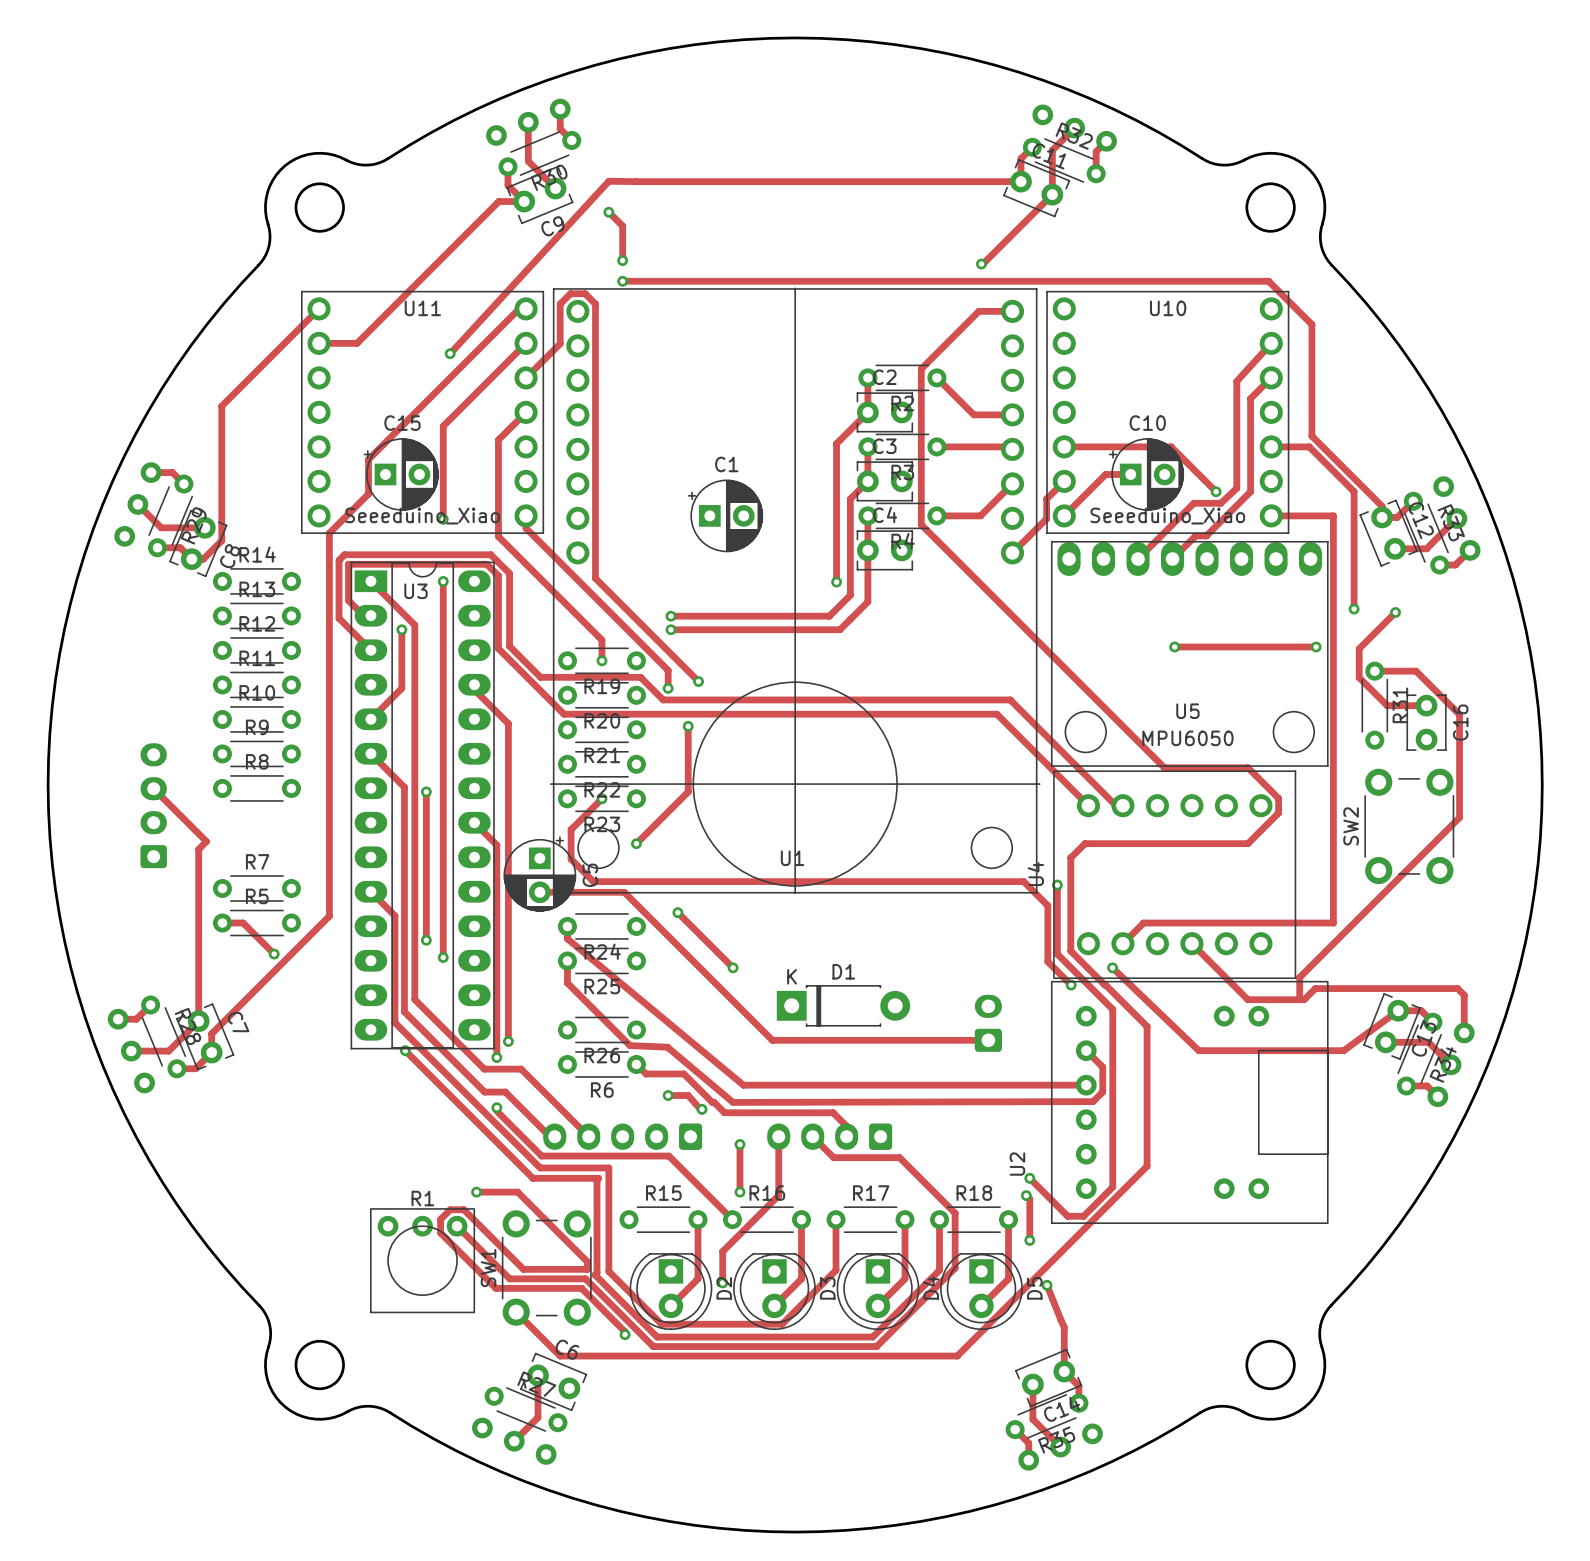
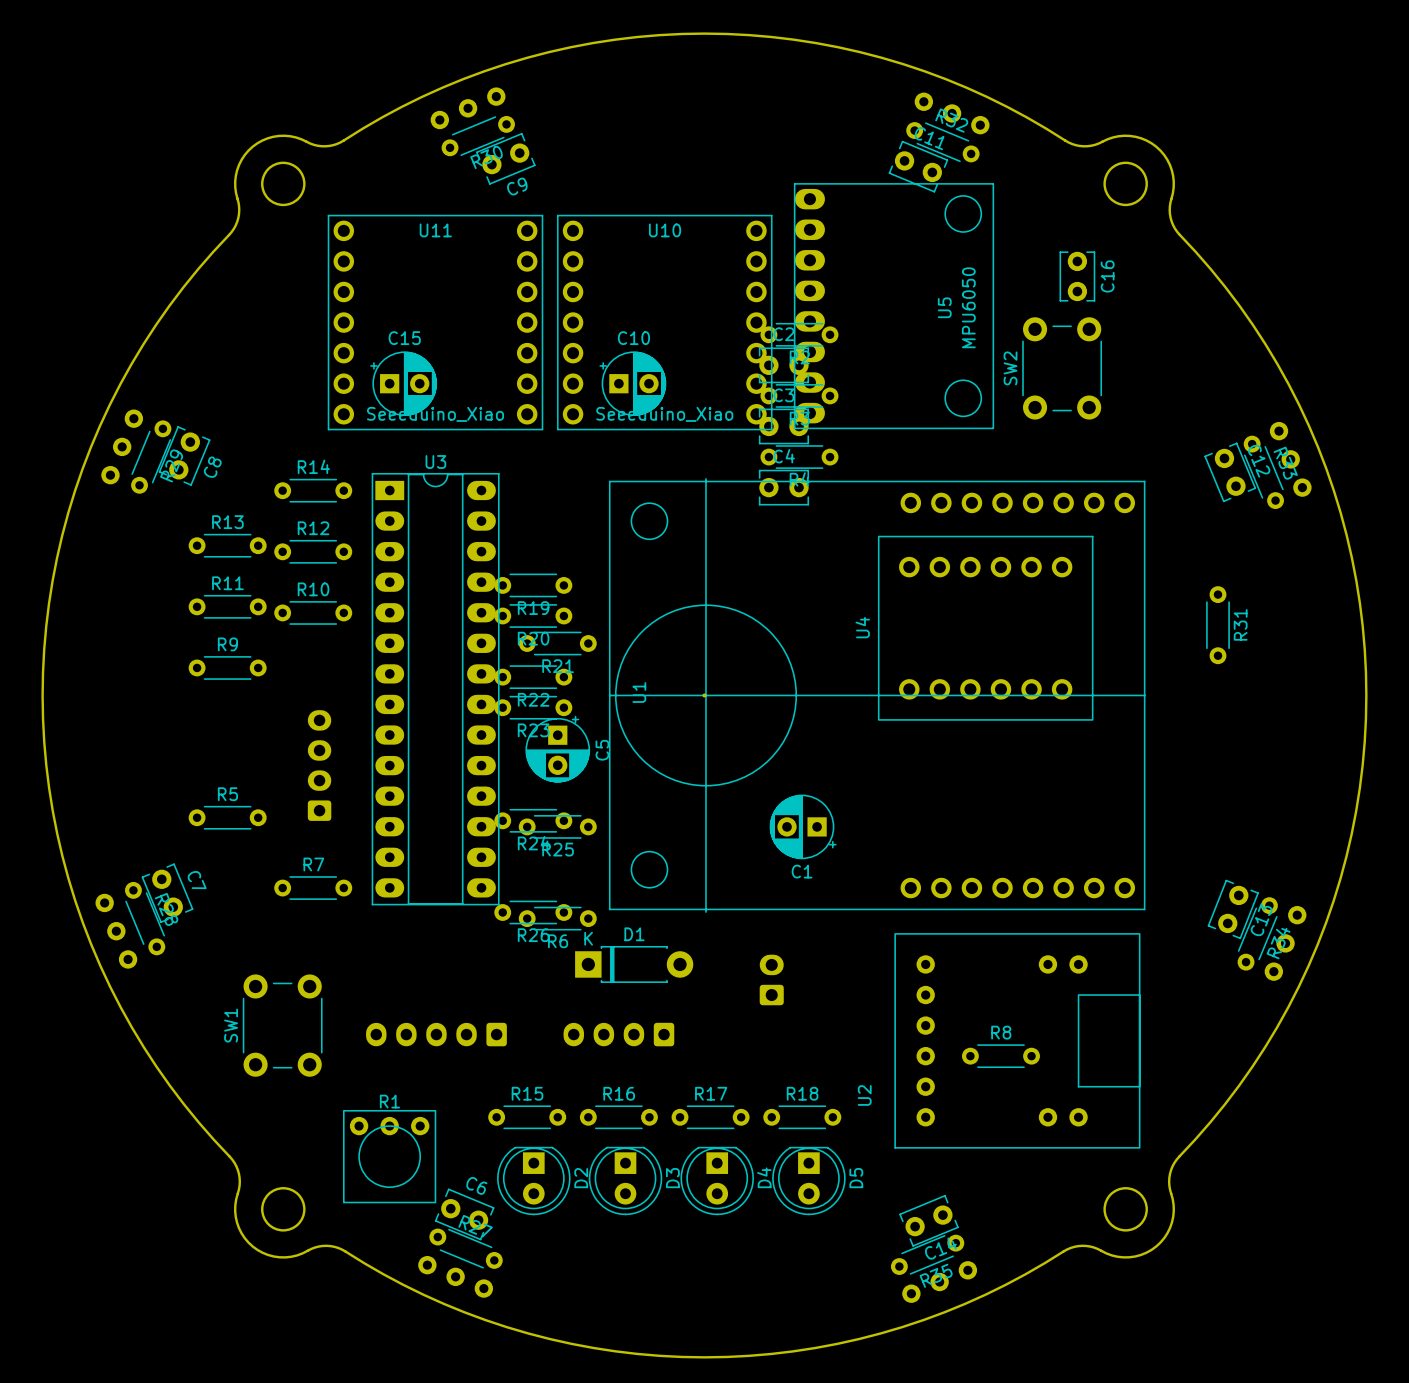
track: (560, 109) (560, 128) (571, 140) -> none
track: (528, 122) (528, 161) (555, 188) -> none
track: (1074, 128) (1052, 150) (1052, 194) (981, 264) -> none
track: (1106, 141) (1096, 151) (1096, 173) -> none
track: (1032, 147) (1021, 158) (1021, 181) (608, 181) (450, 353) -> none
track: (507, 166) (507, 185) (524, 201) (498, 201) (357, 343) (319, 343) -> none
C9 position: (539, 195) -> (505, 158)
track: (608, 212) (622, 226) (622, 260) -> none
via: (608, 212) -> none
via: (622, 260) -> none
via: (981, 264) -> none
track: (622, 281) (1268, 281) (1311, 324) (1311, 436) (1382, 506) (1382, 517) (1397, 517) (1413, 501) -> none
via: (622, 281) -> none
track: (319, 308) (221, 406) (221, 540) (203, 559) (191, 559) (180, 547) (157, 547) -> none
track: (526, 308) (519, 308) (368, 459) (368, 494) (329, 533) (329, 916) (211, 1033) (211, 1052) (195, 1068) (177, 1068) -> none
track: (1012, 311) (978, 311) (921, 368) (921, 524) (1164, 767) (1247, 767) (1278, 798) (1278, 813) (1247, 843) (1084, 843) (1070, 857) (1070, 951) (1147, 1026) (1147, 1166) (957, 1356) (560, 1356) (516, 1312) -> none
track: (526, 343) (443, 426) (443, 519) -> none
track: (1271, 343) (1236, 381) (1236, 488) (1220, 503) (1193, 503) (1138, 559) -> none
via: (450, 353) -> none
track: (526, 377) (560, 343) (560, 304) (570, 293) (585, 293) (595, 304) (595, 578) (698, 681) -> none
track: (867, 377) (867, 412) (836, 443) (836, 582) -> none
track: (936, 377) (973, 414) (1012, 414) -> none
track: (1271, 377) (1250, 398) (1250, 491) (1206, 535) (1195, 535) (1172, 559) -> none
U11 position: (422, 412) -> (435, 322)
track: (526, 412) (498, 439) (498, 536) (601, 640) (601, 660) -> none
U10 position: (1167, 412) -> (664, 322)
track: (867, 446) (867, 481) (850, 498) (850, 595) (829, 616) (670, 616) -> none
track: (936, 446) (1010, 446) (1012, 449) -> none
track: (1064, 446) (1171, 446) (1216, 491) -> none
track: (1271, 446) (1309, 446) (1354, 491) (1354, 609) -> none
track: (151, 472) (172, 472) (183, 484) -> none
C15 position: (401, 474) -> (403, 383)
track: (1130, 474) (1105, 474) (1064, 515) -> none
C10 position: (1146, 474) -> (632, 383)
track: (1064, 481) (1046, 499) (1046, 518) (1012, 552) -> none
track: (1012, 483) (980, 515) (936, 515) -> none
via: (1216, 491) -> none
track: (137, 504) (161, 527) (204, 527) -> none
track: (526, 515) (526, 528) (668, 670) (668, 688) -> none
C1 rotation: 0° (725, 515) -> 180° (803, 826)
C1 position: (725, 515) -> (803, 826)
track: (867, 515) (867, 601) (840, 629) (670, 629) -> none
track: (1271, 515) (1333, 515) (1333, 923) (1143, 923) (1122, 943) -> none
track: (1456, 518) (1426, 548) (1395, 548) -> none
via: (443, 519) -> none
C8 position: (198, 543) -> (184, 455)
track: (1470, 550) (1455, 565) (1439, 565) -> none
R14 position: (256, 581) -> (313, 490)
track: (370, 581) (414, 625) (414, 999) (484, 1069) (521, 1069) (588, 1136) -> none
track: (443, 581) (443, 957) -> none
via: (443, 581) -> none
via: (836, 582) -> none
U1 rotation: 0° (795, 590) -> 90° clockwise (877, 695)
U3 name position: U3 (415, 591) -> U3 (435, 462)
via: (1354, 609) -> none
track: (1395, 612) (1359, 648) (1359, 677) (1387, 705) (1426, 705) -> none
via: (1395, 612) -> none
track: (370, 615) (363, 615) (348, 600) (348, 564) (486, 564) (498, 575) (498, 648) (564, 714) (996, 714) (1088, 805) -> none
via: (670, 616) -> none
track: (401, 629) (401, 688) (370, 719) -> none
via: (401, 629) -> none
via: (670, 629) -> none
track: (1174, 647) (1316, 647) -> none
via: (1174, 647) -> none
via: (1316, 647) -> none
R12 position: (256, 650) -> (313, 551)
track: (370, 650) (339, 618) (339, 560) (344, 554) (490, 554) (509, 573) (509, 646) (540, 677) (640, 677) (663, 699) (1010, 699) (1116, 805) (1122, 805) -> none
U5 rotation: 0° (1189, 653) -> 90° counterclockwise (893, 306)
U5 position: (1189, 653) -> (893, 306)
via: (601, 660) -> none
track: (1374, 671) (1416, 671) (1459, 714) (1459, 817) (1299, 977) (1299, 999) -> none
via: (698, 681) -> none
track: (474, 684) (474, 689) (508, 723) (508, 1041) -> none
via: (668, 688) -> none
R10 position: (256, 719) -> (313, 612)
C16 position: (1426, 722) -> (1077, 276)
track: (688, 726) (688, 791) (636, 843) -> none
via: (688, 726) -> none
R21 position: (601, 729) -> (557, 643)
track: (370, 753) (404, 787) (404, 1011) (484, 1092) (505, 1092) (549, 1136) (554, 1136) -> none
round board edge: none -> [703, 694, 706, 697]
track: (153, 788) (206, 841) (198, 849) (198, 1021) (168, 1051) (131, 1051) -> none
R8 position: (256, 788) -> (1000, 1056)
track: (426, 791) (426, 940) -> none
via: (426, 791) -> none
track: (601, 798) (571, 829) (571, 859) (593, 881) (1023, 881) (1047, 905) (1047, 961) (1071, 985) -> none
via: (601, 798) -> none
part position: (153, 805) -> (319, 765)
U3 position: (422, 805) -> (435, 689)
track: (474, 822) (496, 845) (496, 1057) -> none
SW2 position: (1409, 826) -> (1062, 368)
via: (636, 843) -> none
C5 position: (539, 874) -> (557, 749)
U4 position: (1174, 874) -> (985, 628)
track: (1057, 885) (1057, 954) (1112, 1009) (1112, 1187) (1083, 1216) (1067, 1216) (1029, 1178) -> none
via: (1057, 885) -> none
R7 position: (256, 888) -> (313, 888)
track: (370, 891) (394, 915) (394, 1022) (540, 1167) (608, 1167) (608, 1271) (661, 1324) (782, 1324) (836, 1270) (836, 1219) -> none
track: (539, 892) (624, 892) (772, 1040) (988, 1040) -> none
track: (677, 912) (733, 967) -> none
via: (677, 912) -> none
track: (222, 923) (243, 923) (274, 954) -> none
track: (567, 926) (567, 938) (743, 1085) (1086, 1085) -> none
via: (426, 940) -> none
track: (1191, 943) (1247, 999) (1304, 999) (1315, 988) (1457, 988) (1464, 995) (1464, 1032) -> none
via: (274, 954) -> none
via: (443, 957) -> none
track: (567, 960) (567, 983) (630, 1045) (667, 1047) (733, 1102) (1093, 1101) (1102, 1091) (1102, 1067) (1086, 1050) -> none
R25 position: (601, 960) -> (557, 826)
via: (733, 967) -> none
track: (1112, 967) (1198, 1050) (1343, 1050) (1398, 1010) (1421, 1010) (1432, 1022) -> none
via: (1112, 967) -> none
via: (1071, 985) -> none
track: (150, 1004) (136, 1019) (118, 1019) -> none
D1 position: (843, 1005) -> (634, 964)
part position: (988, 1023) -> (771, 979)
C7 position: (205, 1036) -> (167, 893)
via: (508, 1041) -> none
track: (1385, 1042) (1428, 1042) (1451, 1064) -> none
track: (405, 1050) (532, 1178) (598, 1178) (597, 1272) (595, 1274) (657, 1337) (872, 1337) (939, 1270) (939, 1219) -> none
via: (405, 1050) -> none
via: (496, 1057) -> none
R6 position: (601, 1064) -> (557, 918)
track: (636, 1064) (645, 1073) (683, 1073) (724, 1112) (833, 1112) (846, 1126) (846, 1136) -> none
track: (1406, 1085) (1427, 1085) (1437, 1096) -> none
track: (668, 1095) (688, 1095) (702, 1111) (702, 1109) -> none
via: (668, 1095) -> none
U2 position: (1189, 1102) -> (1017, 1040)
via: (496, 1107) -> none
via: (702, 1109) -> none
track: (496, 1111) (541, 1156) (668, 1156) (732, 1219) -> none
part position: (622, 1136) -> (436, 1034)
track: (778, 1136) (778, 1195) (722, 1251) (722, 1282) -> none
track: (812, 1136) (833, 1157) (899, 1157) (955, 1213) (955, 1268) (876, 1346) (653, 1346) (585, 1278) (509, 1278) (457, 1226) -> none
part position: (829, 1136) -> (618, 1034)
track: (739, 1144) (739, 1192) -> none
via: (739, 1144) -> none
via: (1029, 1178) -> none
track: (476, 1192) (517, 1192) (587, 1261) (587, 1269) (523, 1269) (463, 1209) (450, 1209) (440, 1219) (440, 1233) (495, 1288) (581, 1288) (625, 1331) (625, 1334) -> none
via: (476, 1192) -> none
via: (739, 1192) -> none
track: (1026, 1195) (1029, 1199) (1029, 1240) -> none
via: (1026, 1195) -> none
R15 position: (663, 1219) -> (527, 1117)
track: (698, 1219) (698, 1278) (670, 1305) -> none
R16 position: (767, 1219) -> (618, 1117)
track: (801, 1219) (801, 1278) (774, 1305) -> none
R17 position: (870, 1219) -> (710, 1117)
track: (905, 1219) (905, 1278) (877, 1305) -> none
R18 position: (974, 1219) -> (802, 1117)
track: (1008, 1219) (1008, 1278) (981, 1305) -> none
via: (1029, 1240) -> none
R1 position: (422, 1260) -> (389, 1156)
SW1 position: (546, 1268) -> (282, 1025)
via: (722, 1282) -> none
track: (1047, 1285) (1064, 1327) (1064, 1371) (1078, 1386) (1078, 1403) -> none
via: (1047, 1285) -> none
D2 position: (670, 1291) -> (533, 1181)
D3 position: (774, 1291) -> (625, 1181)
D4 position: (877, 1291) -> (717, 1181)
D5 position: (981, 1291) -> (808, 1181)
via: (625, 1334) -> none
track: (537, 1375) (537, 1417) (514, 1441) -> none
C6 position: (553, 1381) -> (464, 1214)
track: (1032, 1384) (1032, 1419) (1060, 1447) -> none
track: (1015, 1429) (1028, 1443) (1028, 1460) -> none

